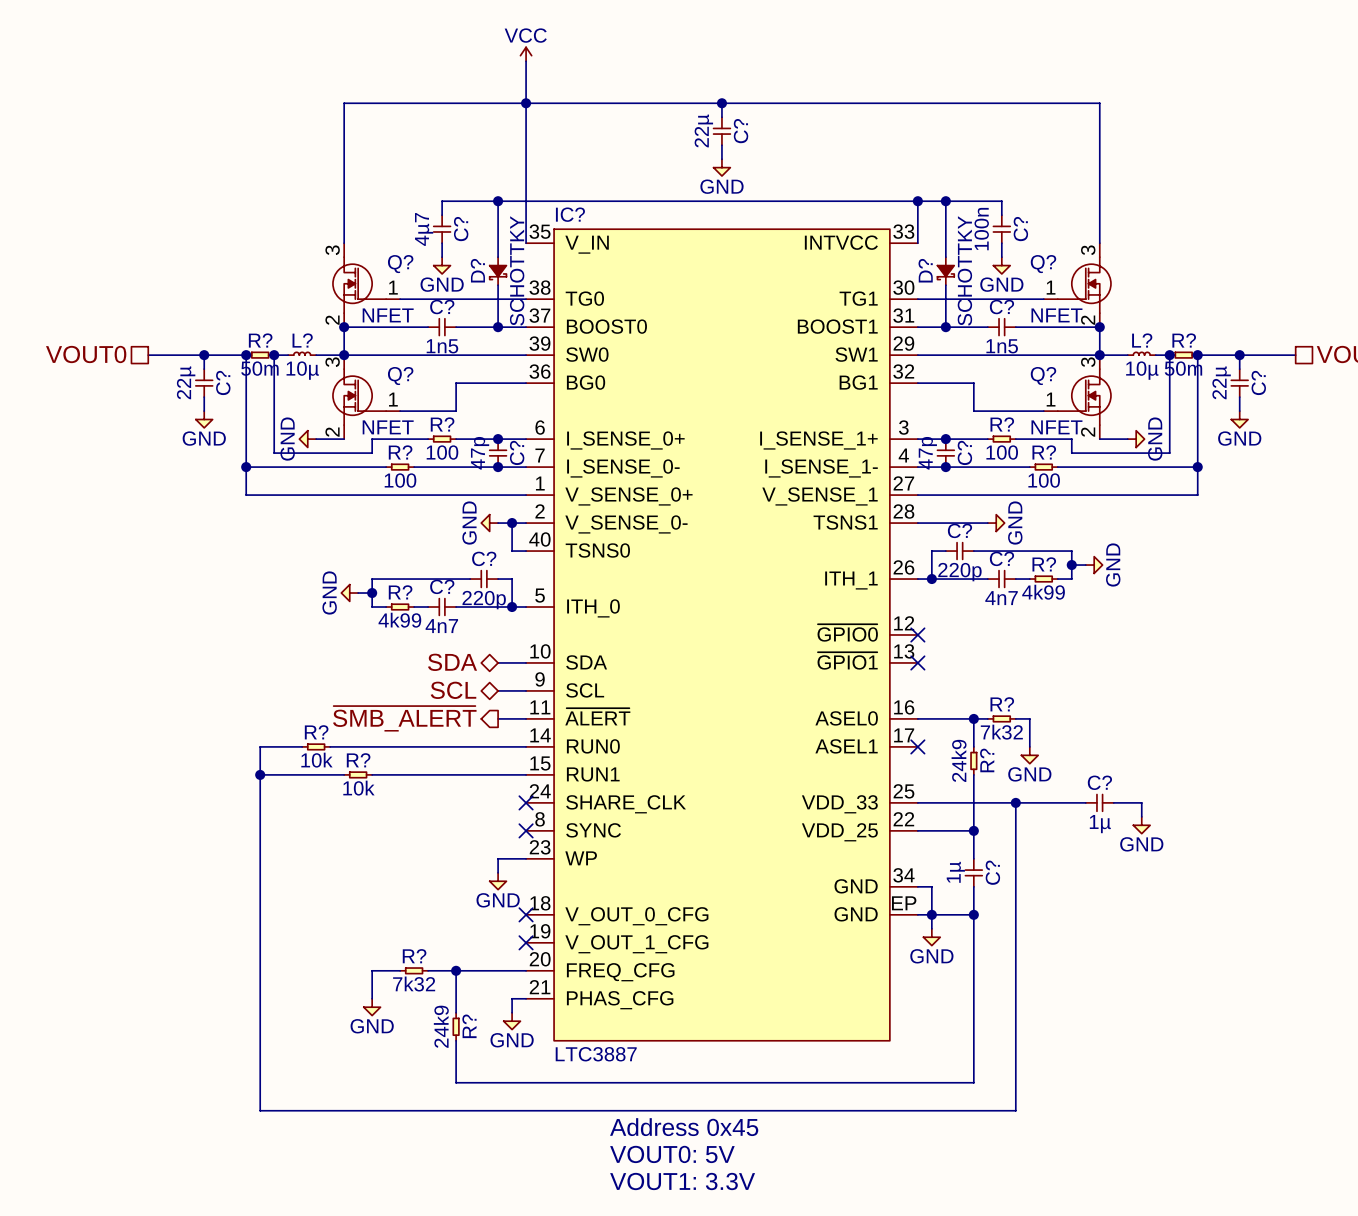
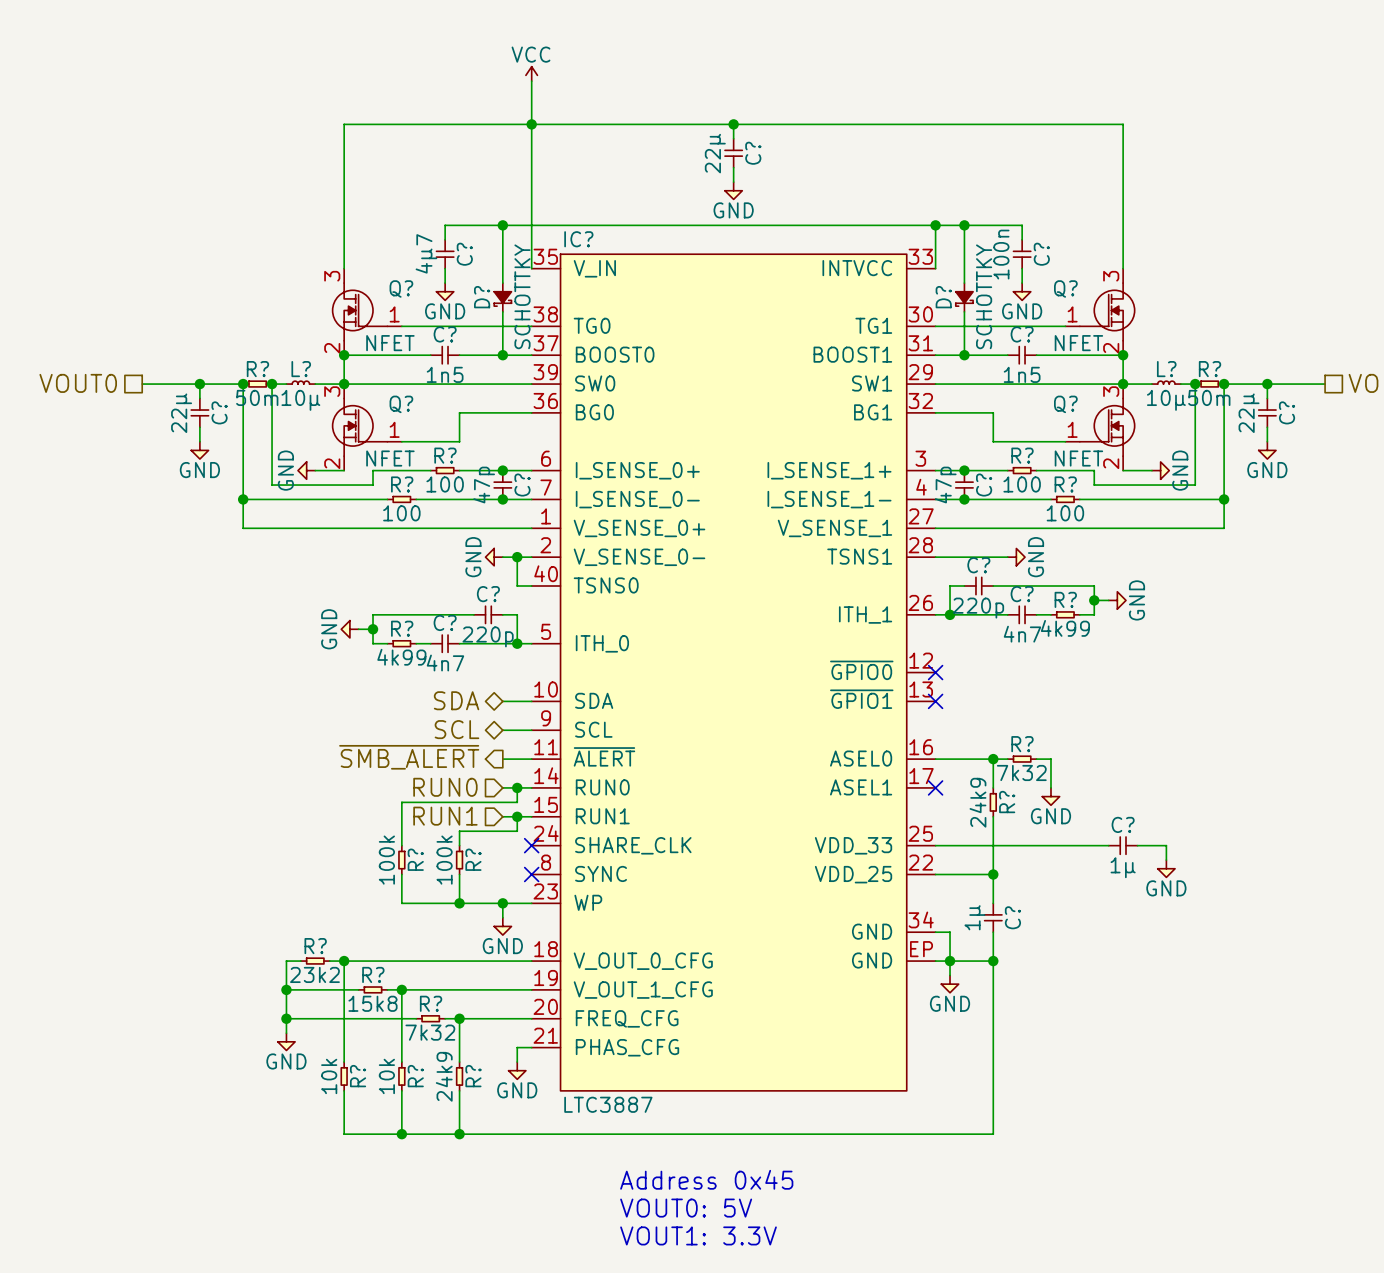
wire: (302, 746) (260, 746) (260, 1110) (1015, 1110) (1015, 802) -> none
R?: 10k (316, 746) -> none
wire: (330, 746) (498, 746) -> none
hierarchical label: none -> RUN0 (445, 787)
wire: none -> (517, 787) (517, 802) (401, 802) (401, 845)
junction: none -> (517, 787)
wire: (260, 774) (344, 774) -> none
junction: (260, 774) -> none
R?: 10k (358, 774) -> none
wire: (372, 774) (498, 774) -> none
hierarchical label: none -> RUN1 (445, 816)
wire: none -> (517, 816) (517, 831) (459, 831) (459, 845)
junction: none -> (517, 816)
junction: (1015, 802) -> none
R?: none -> 100k (401, 860)
R?: none -> 100k (459, 860)
wire: none -> (401, 874) (401, 903) (502, 903)
wire: none -> (459, 874) (459, 903)
junction: none -> (459, 903)
junction: none -> (502, 903)
wire: none -> (300, 961) (286, 961) (286, 1033)
R?: none -> 23k2 (315, 961)
wire: none -> (329, 961) (531, 961)
wire: none -> (344, 961) (344, 1062)
junction: none -> (344, 961)
no-connect mark: (526, 914) -> none
wire: none -> (286, 989) (358, 989)
junction: none -> (286, 989)
R?: none -> 15k8 (373, 989)
wire: none -> (387, 989) (531, 989)
wire: none -> (401, 989) (401, 1062)
junction: none -> (401, 989)
no-connect mark: (526, 942) -> none
junction: none -> (286, 1018)
wire: (372, 970) (372, 998) -> (373, 1018) (286, 1018)
R? position: (414, 970) -> (430, 1018)
power symbol position: GND (372, 1007) -> GND (286, 1041)
R?: none -> 10k (344, 1076)
R?: none -> 10k (401, 1076)
wire: none -> (344, 1090) (344, 1134) (459, 1134)
wire: none -> (401, 1090) (401, 1134)
junction: none -> (401, 1134)
junction: none -> (459, 1134)

